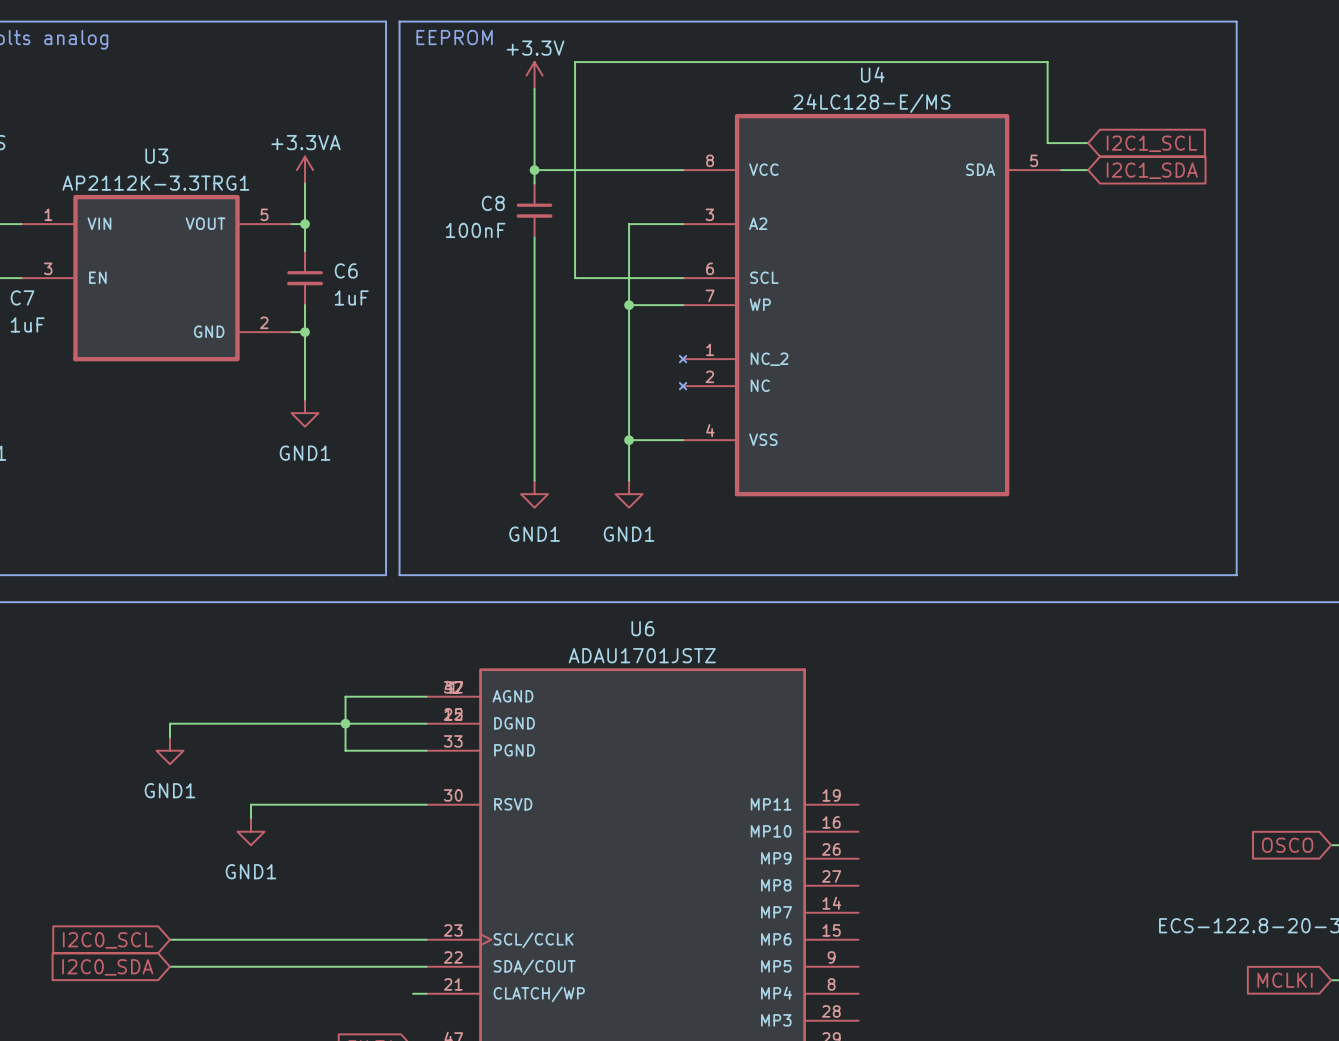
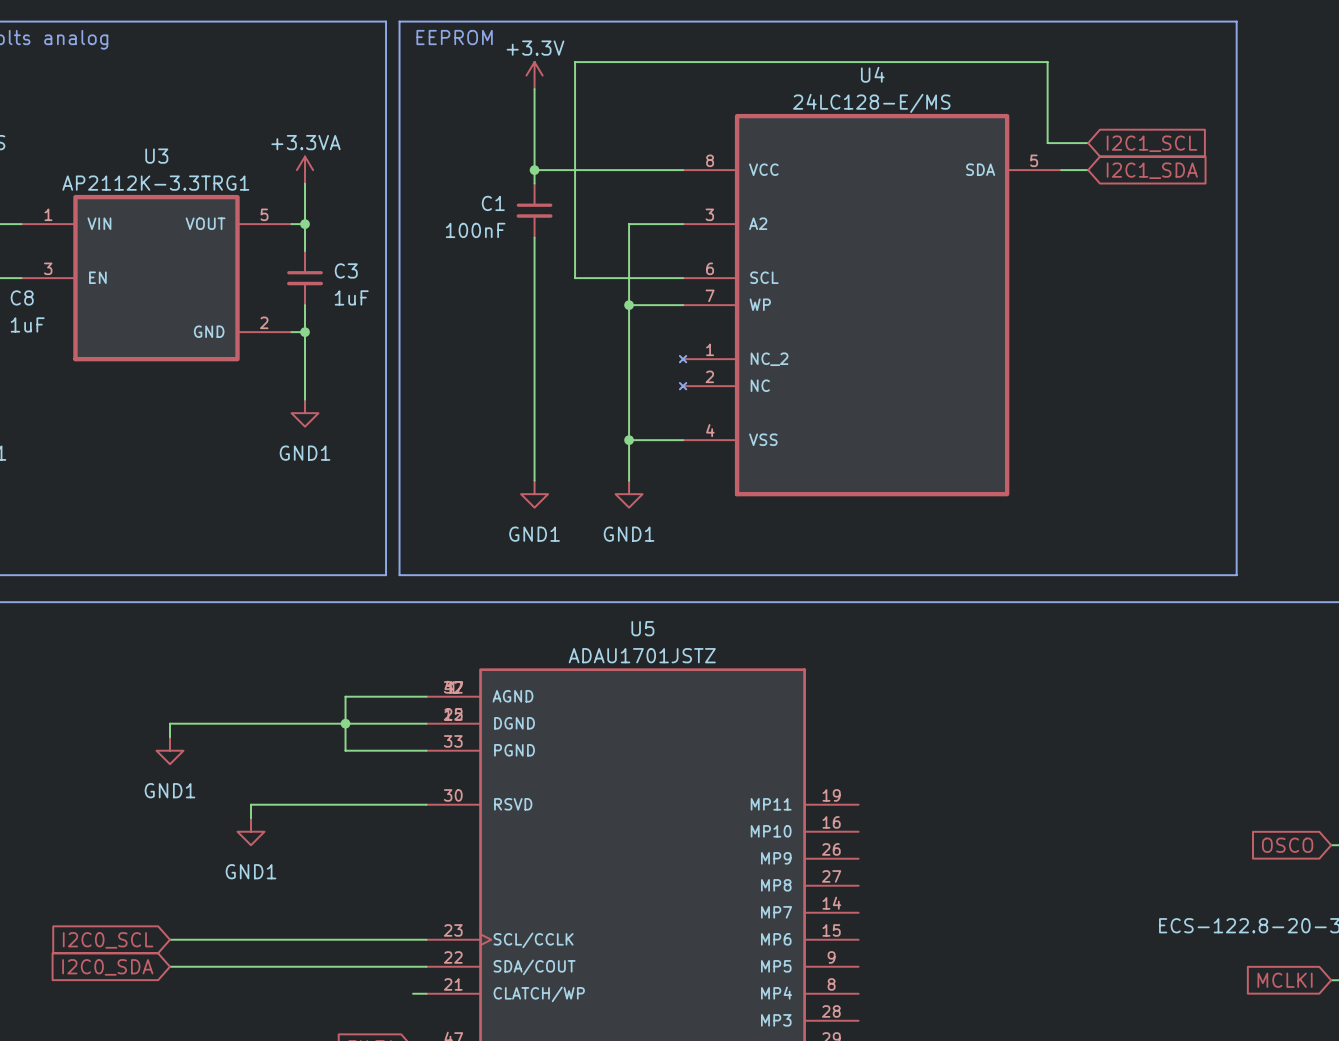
C8 name: C8 (493, 203) -> C1 (493, 203)
C6 name: C6 (346, 270) -> C3 (346, 270)
C7 name: C7 (22, 297) -> C8 (22, 297)
U6 name: U6 (642, 628) -> U5 (642, 628)

